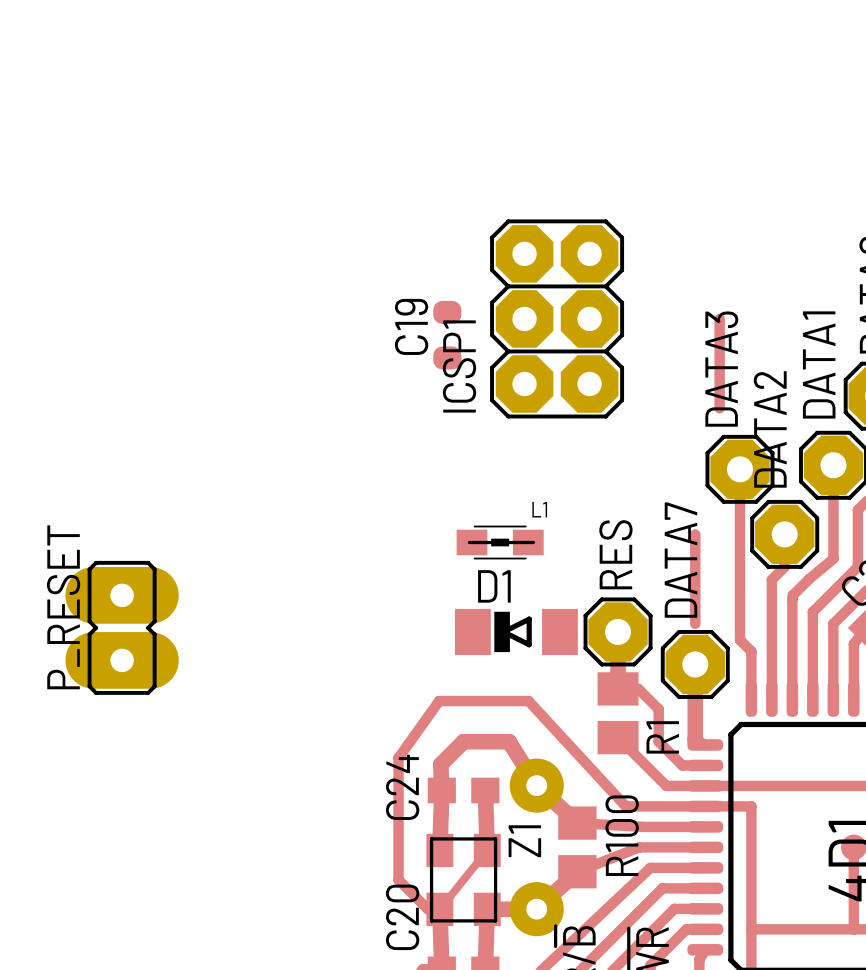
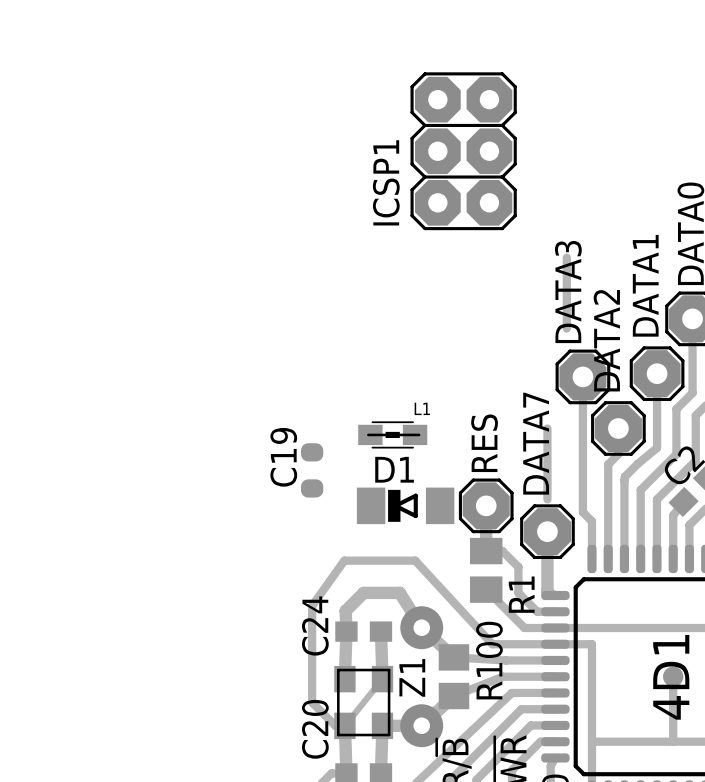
ICSP1 position: (557, 318) -> (463, 151)
C19 position: (447, 335) -> (312, 470)
P_RESET: (122, 627) -> none

